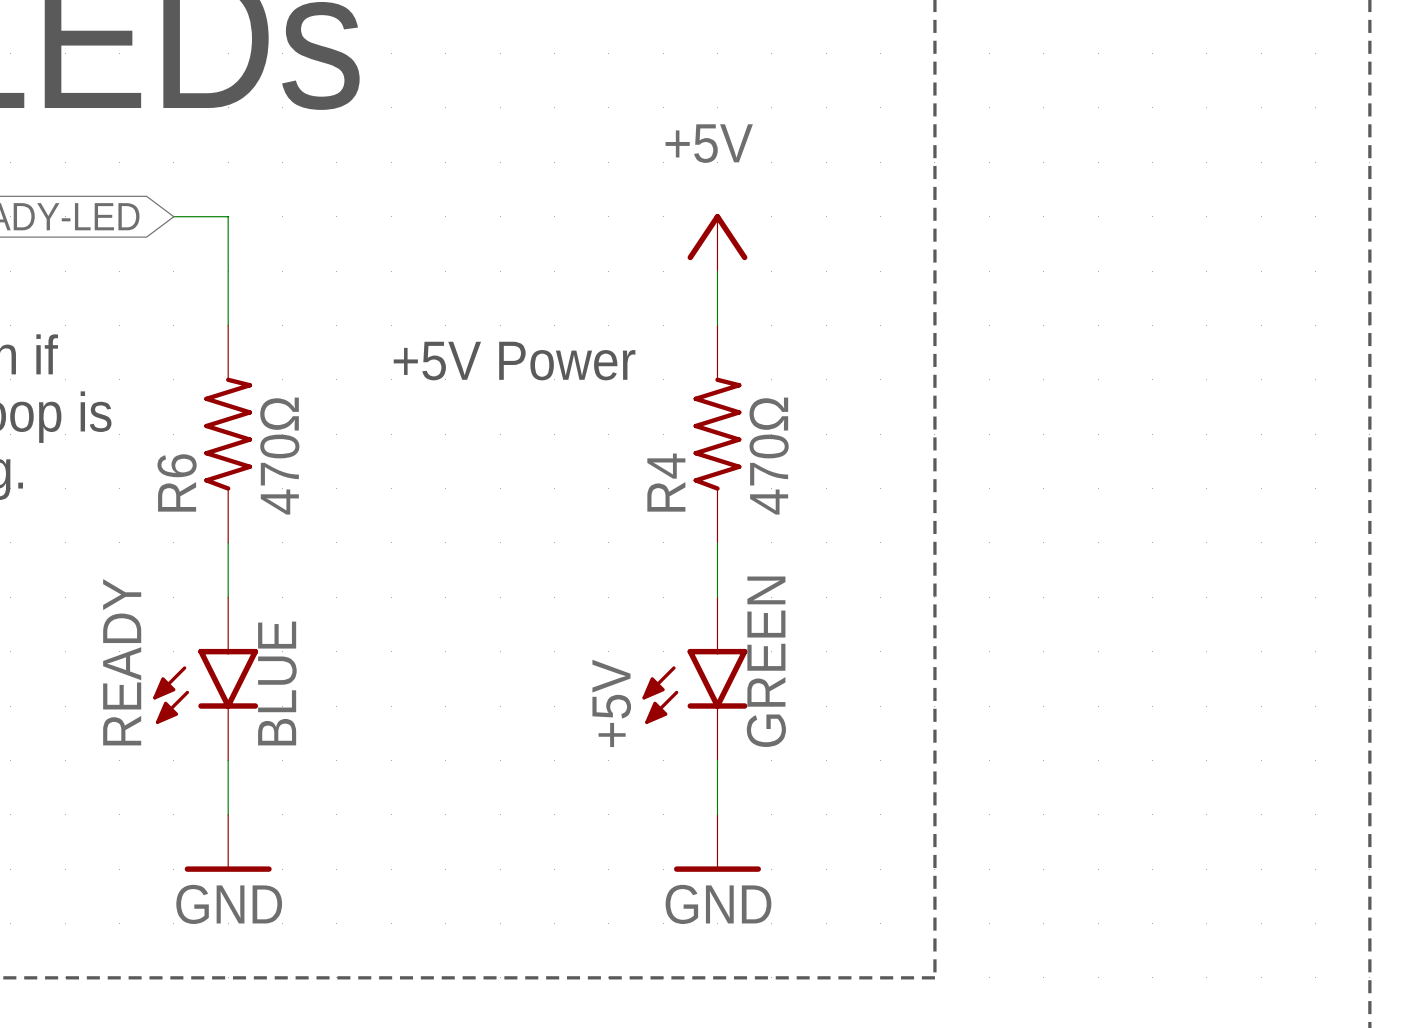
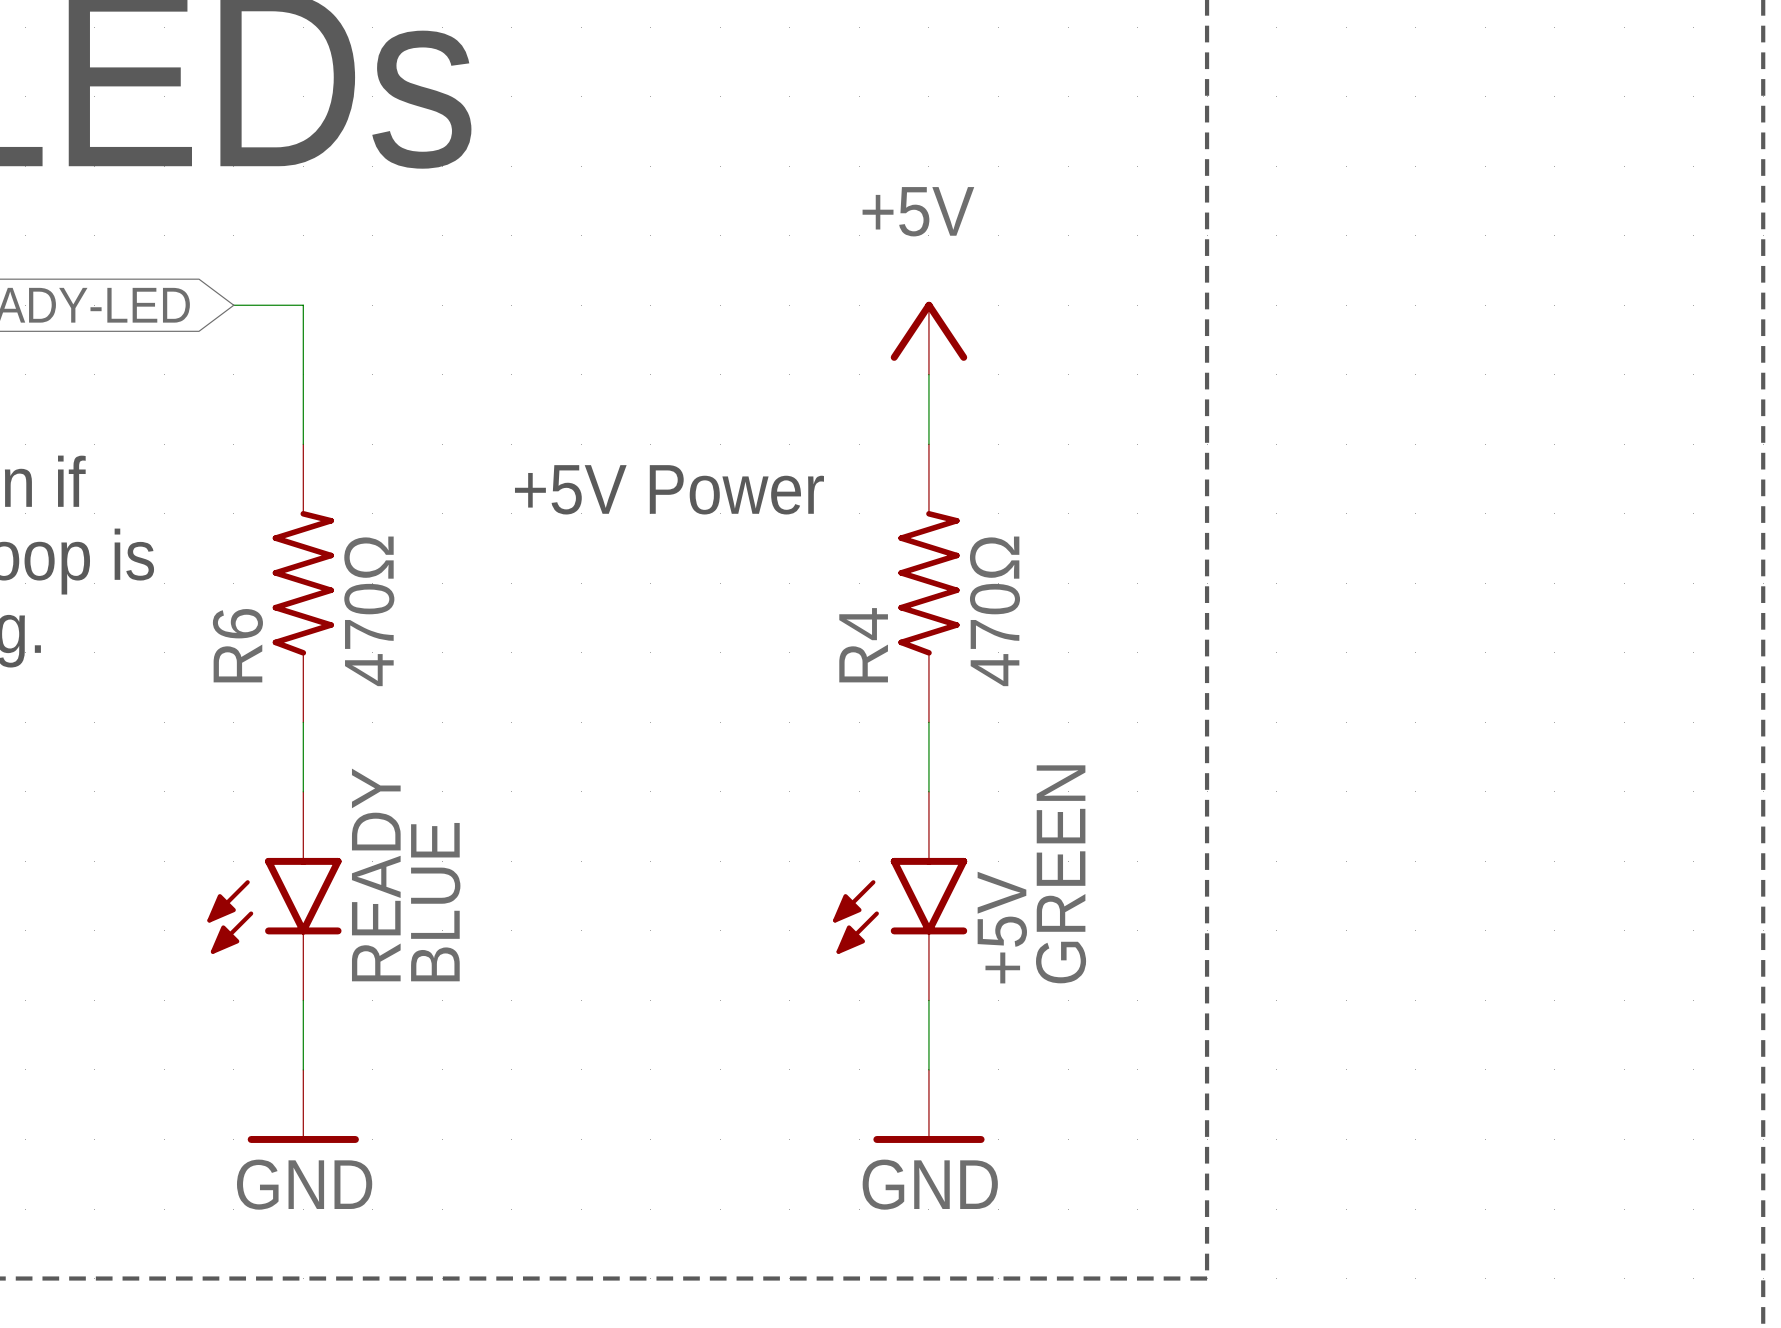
+5V value position: GREEN (766, 661) -> GREEN (1061, 874)
READY name position: READY (122, 662) -> READY (376, 874)
READY value position: BLUE (277, 683) -> BLUE (435, 902)
+5V name position: +5V (611, 703) -> +5V (1002, 927)

